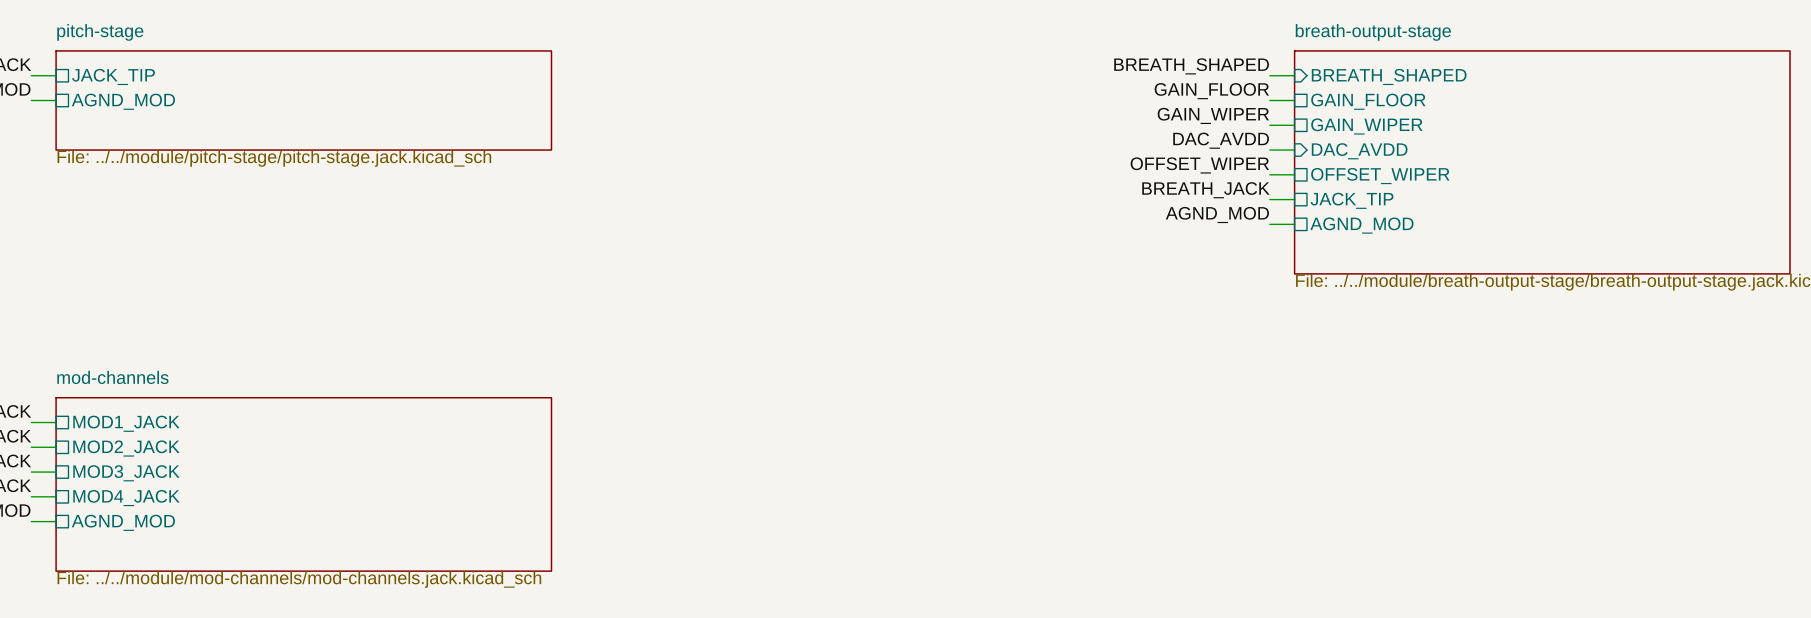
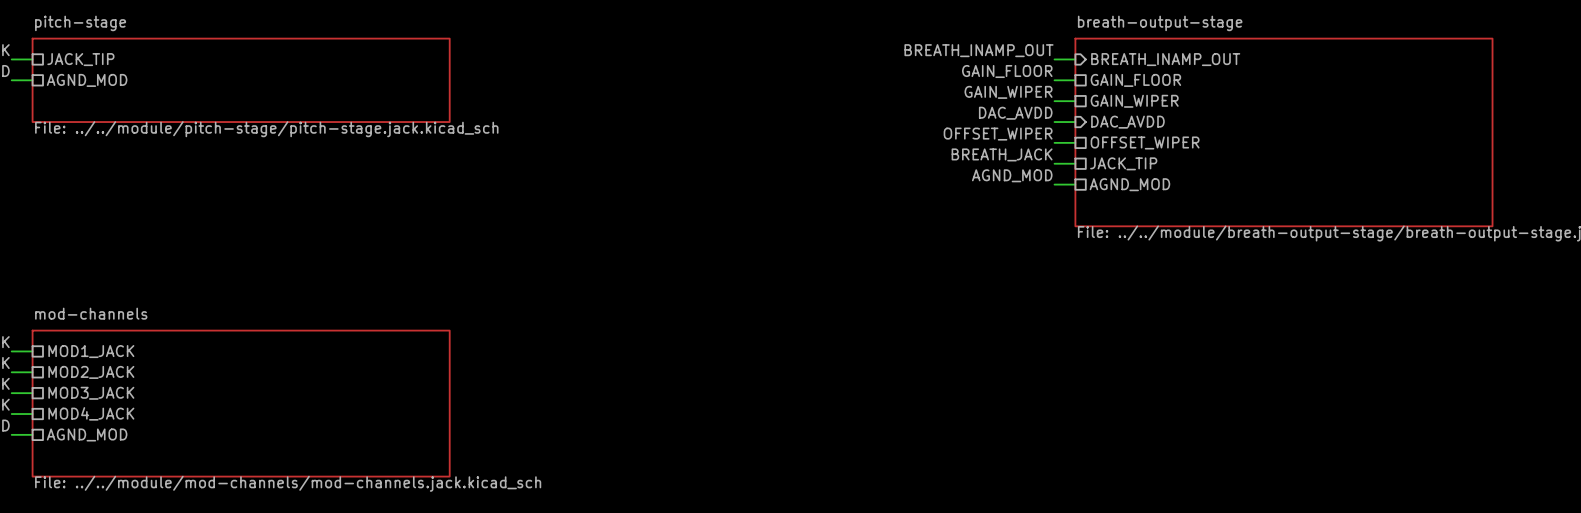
label: BREATH_SHAPED (1191, 66) -> BREATH_INAMP_OUT (978, 50)
sheet pin: BREATH_SHAPED (1389, 76) -> BREATH_INAMP_OUT (1165, 59)

